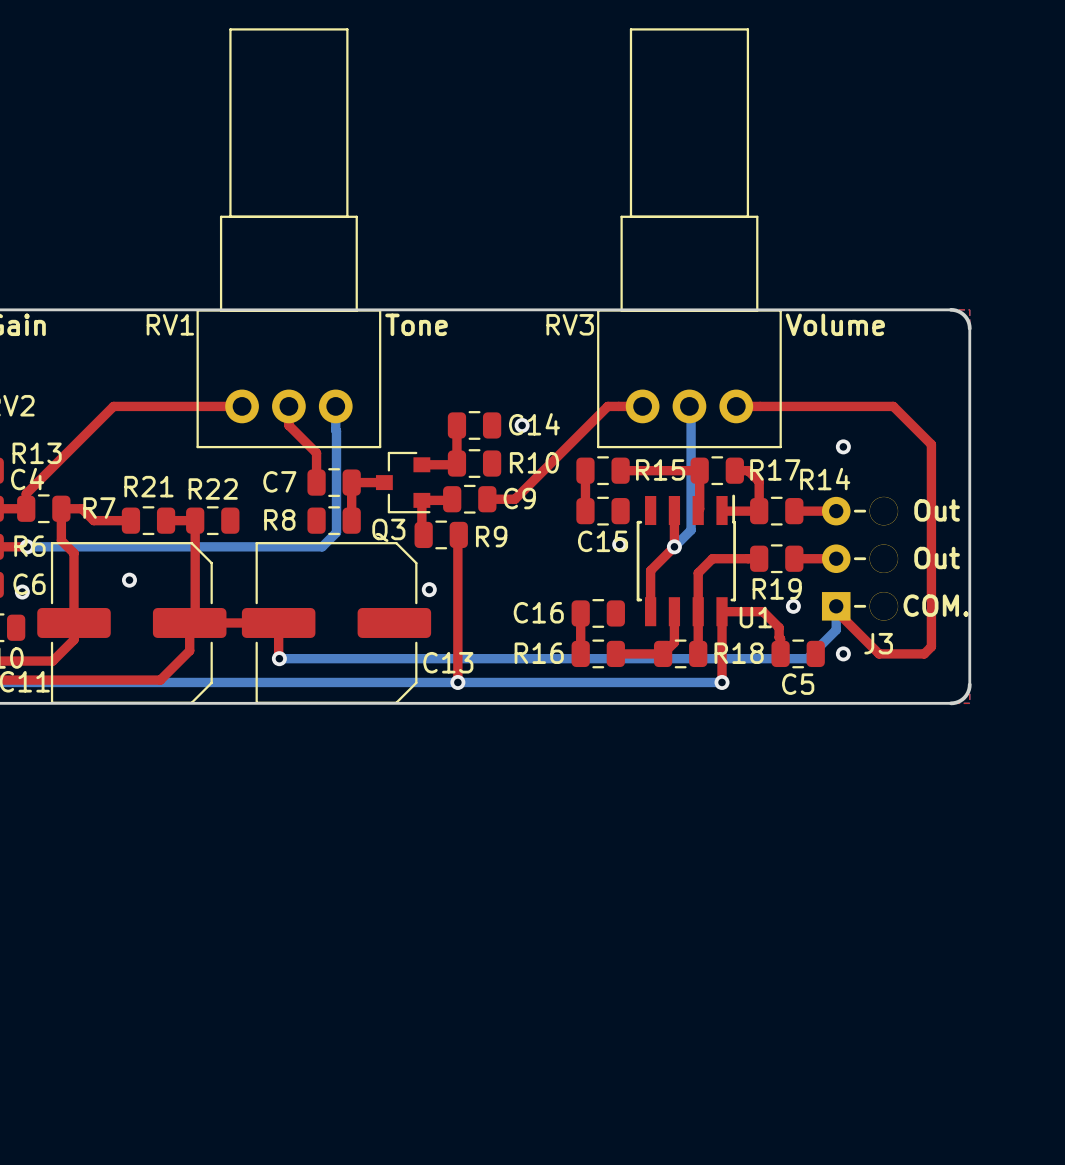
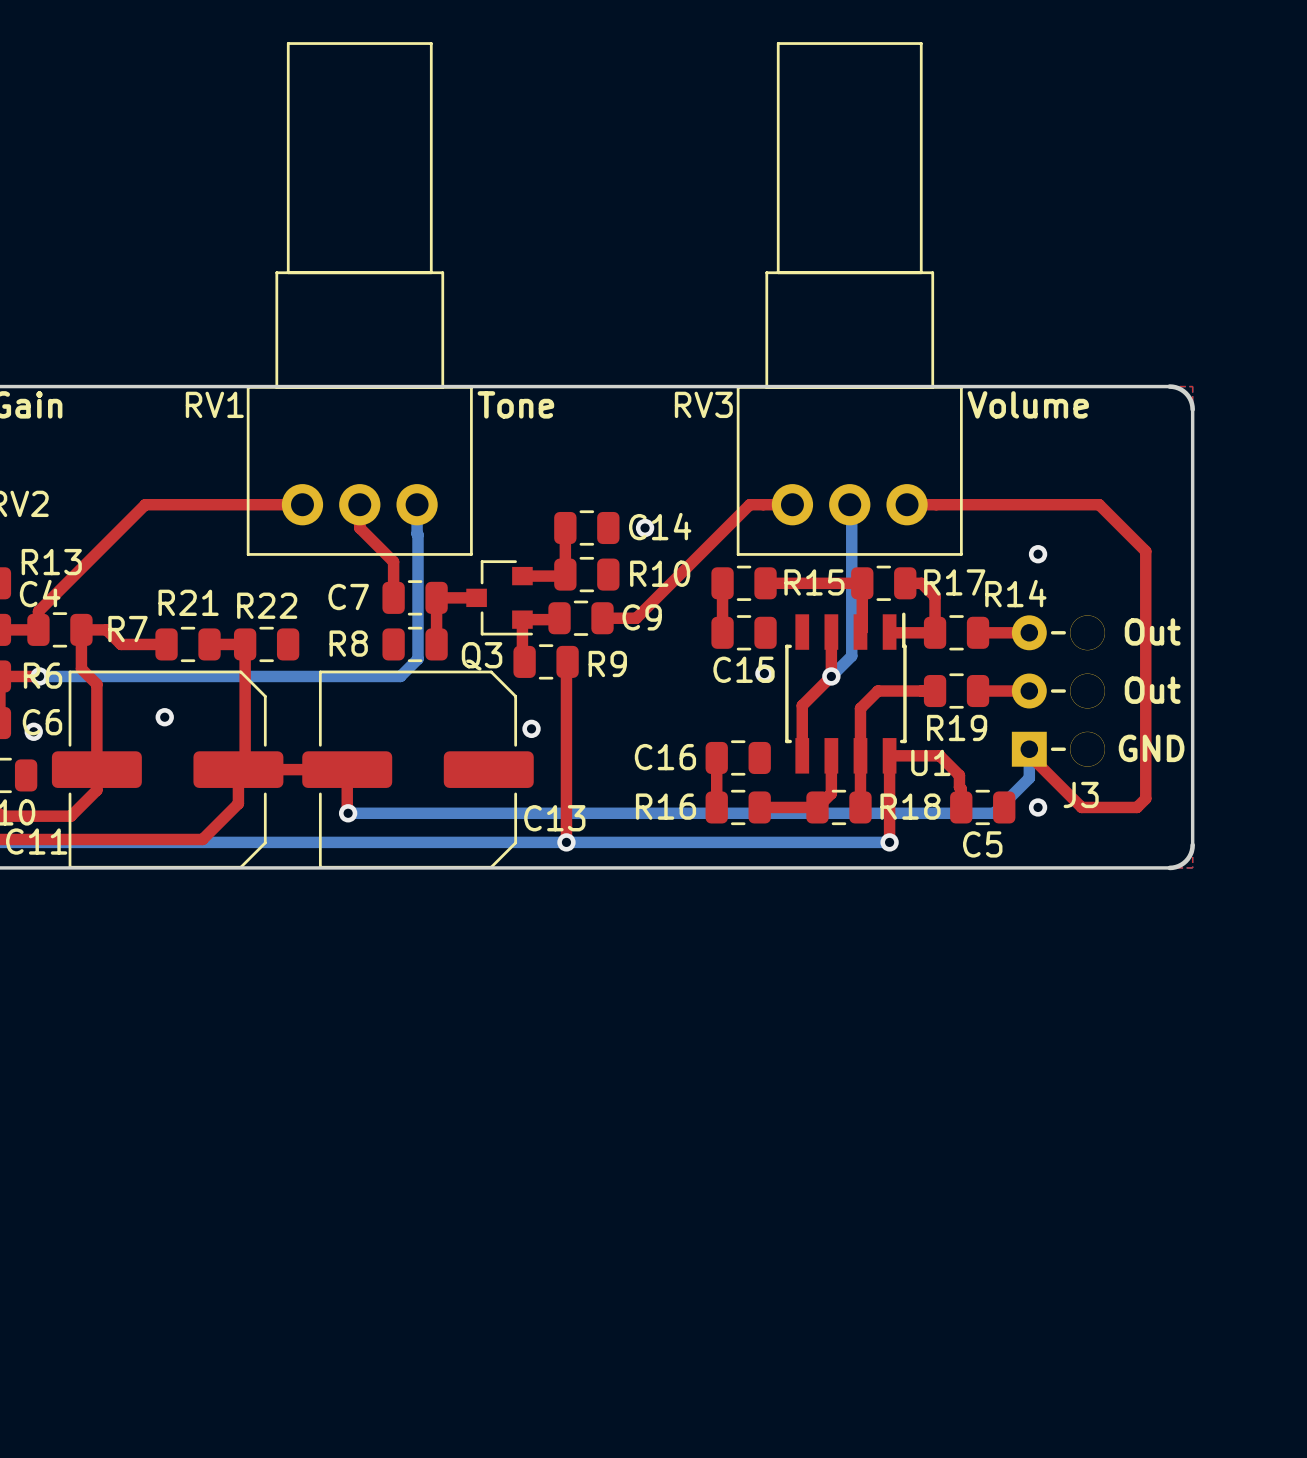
text: COM. (936, 605) -> GND (1151, 748)
via: (793, 606) -> none

